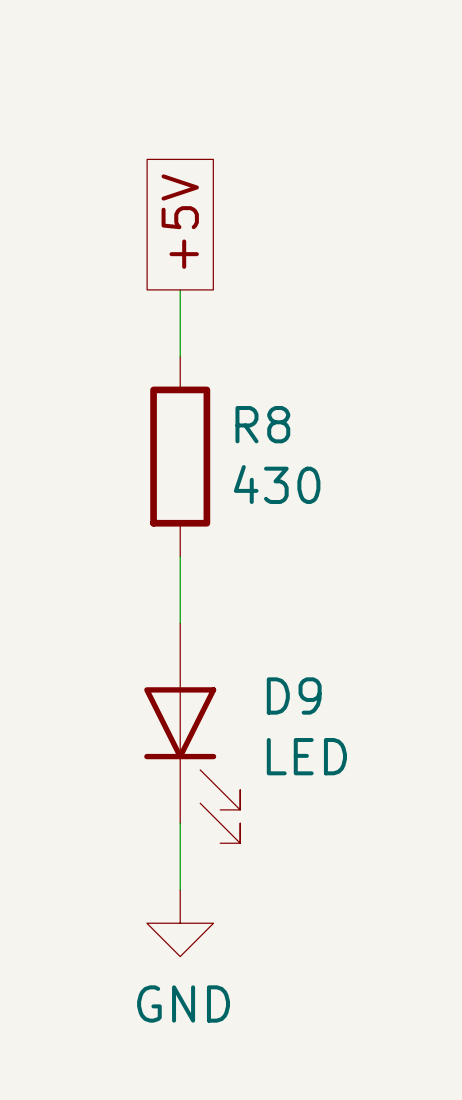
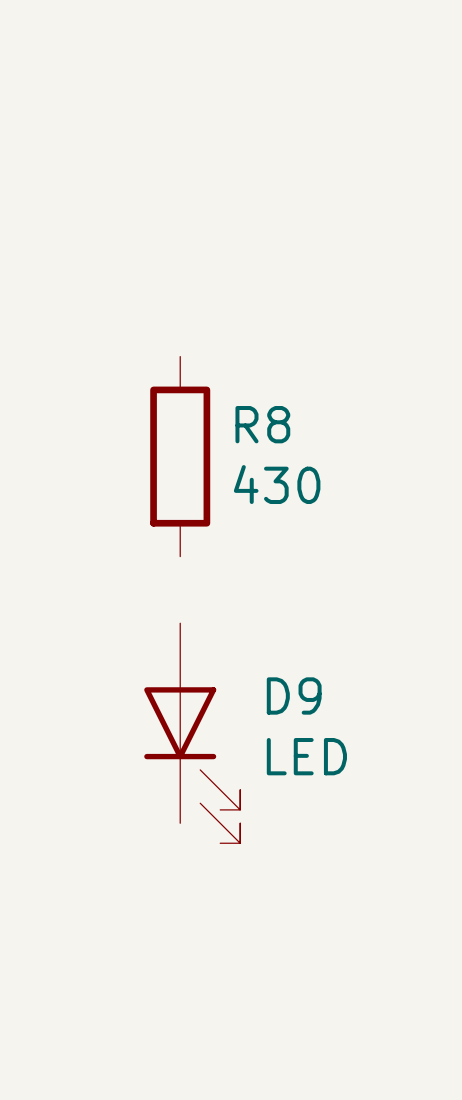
global label: +5V (180, 221) -> none
wire: (180, 289) (180, 356) -> none
wire: (180, 556) (180, 623) -> none
wire: (180, 823) (180, 889) -> none
power symbol: GND (180, 923) -> none

